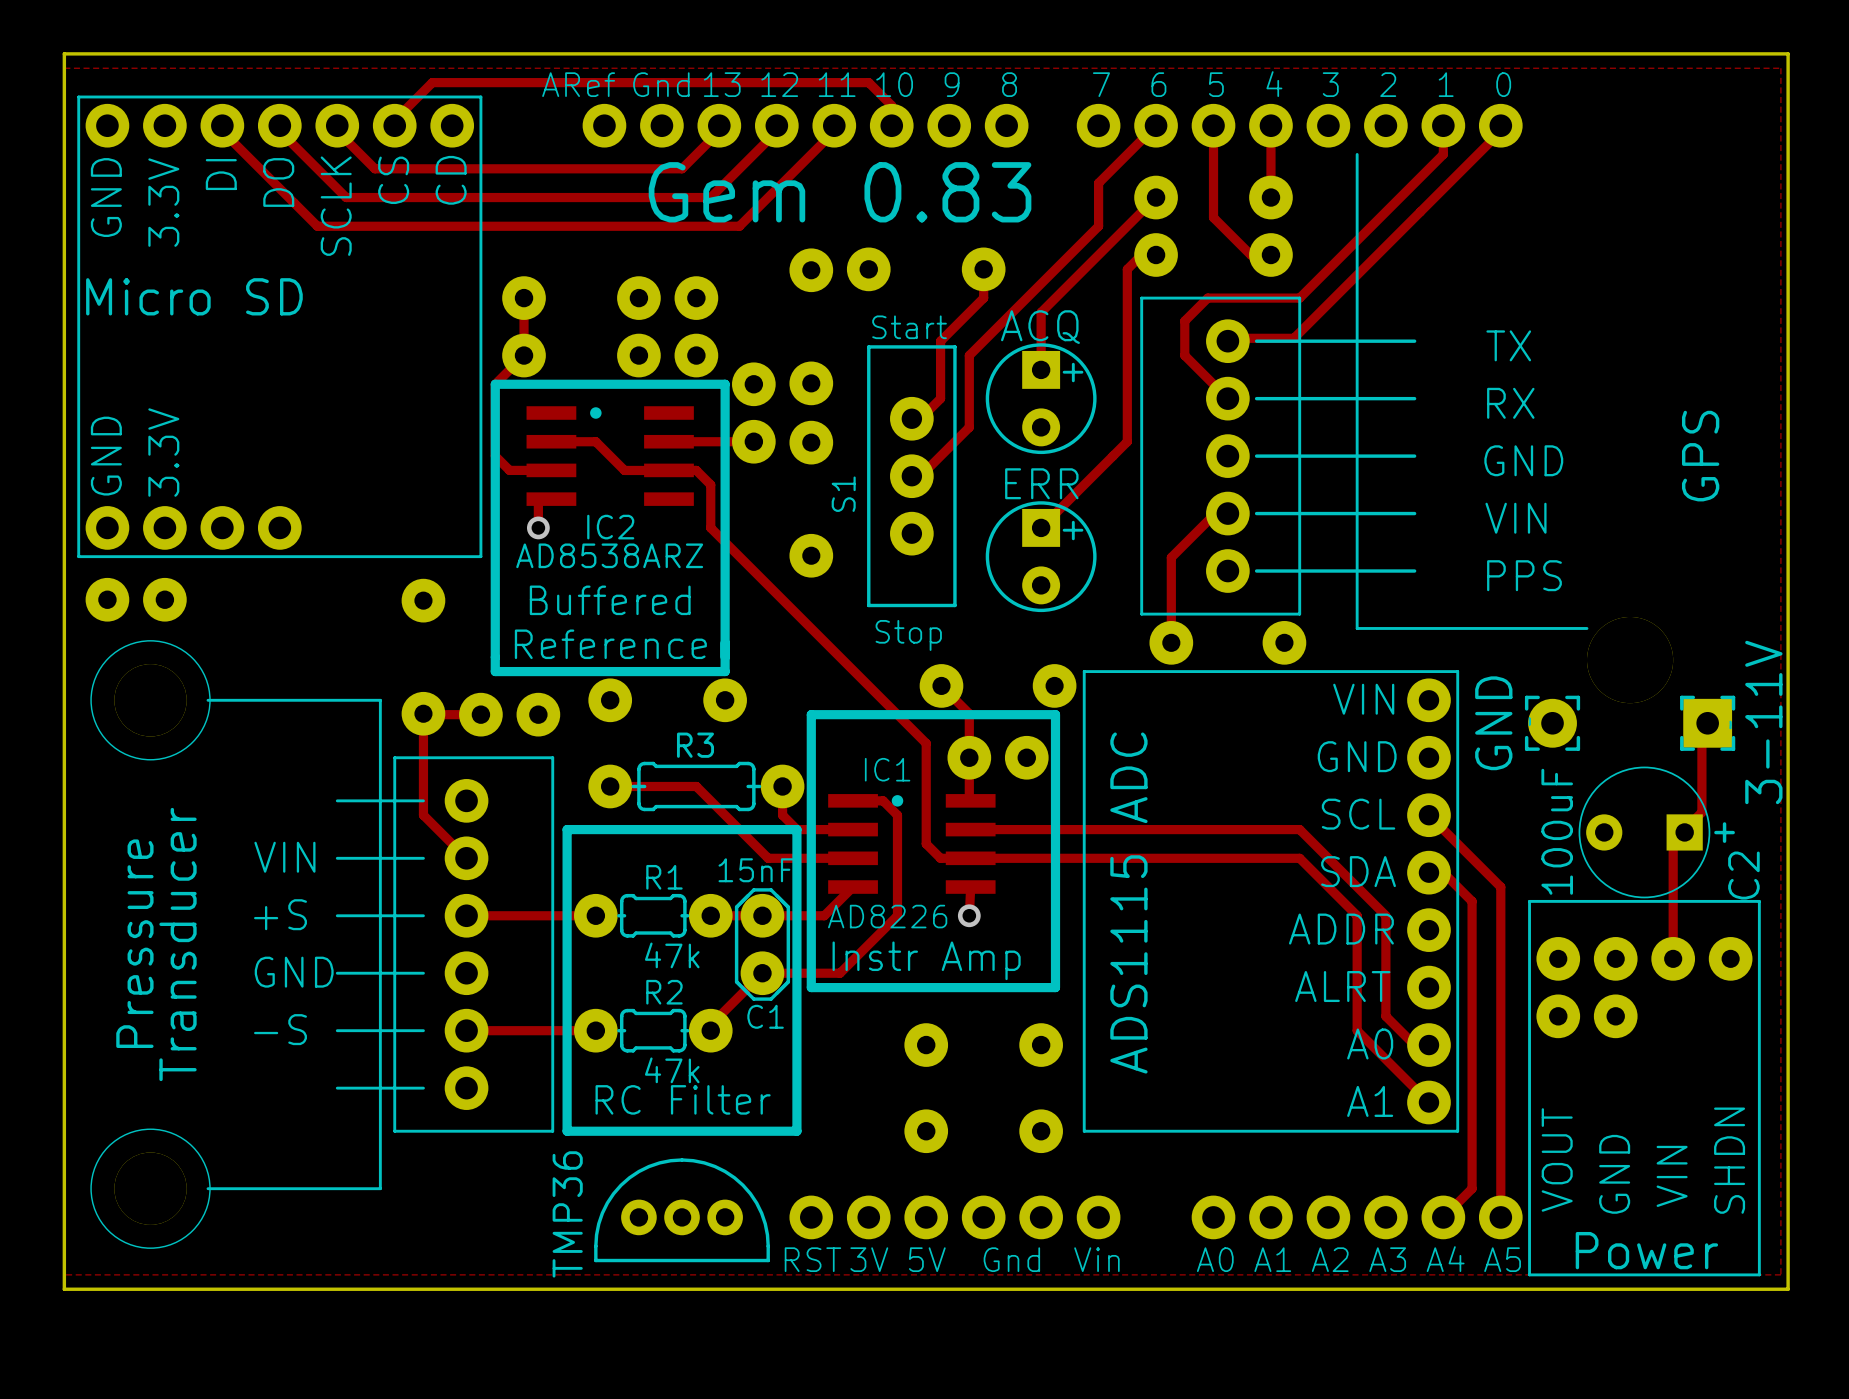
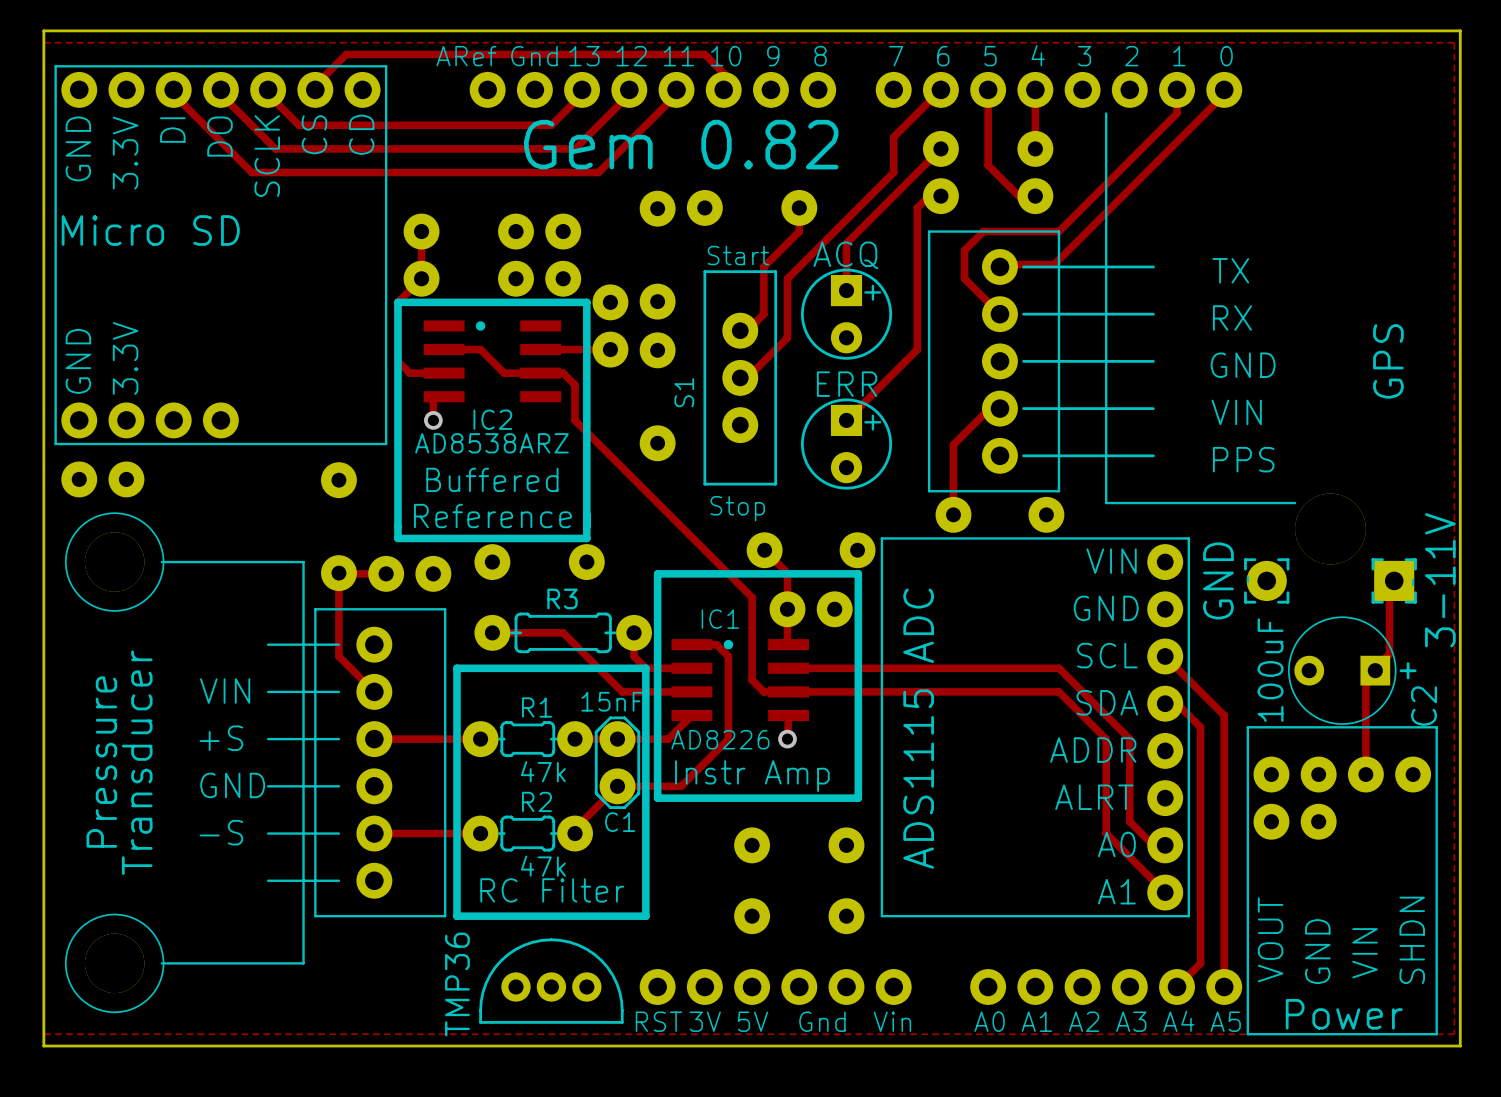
text: Gem 0.83 (840, 192) -> Gem 0.82 (681, 144)

